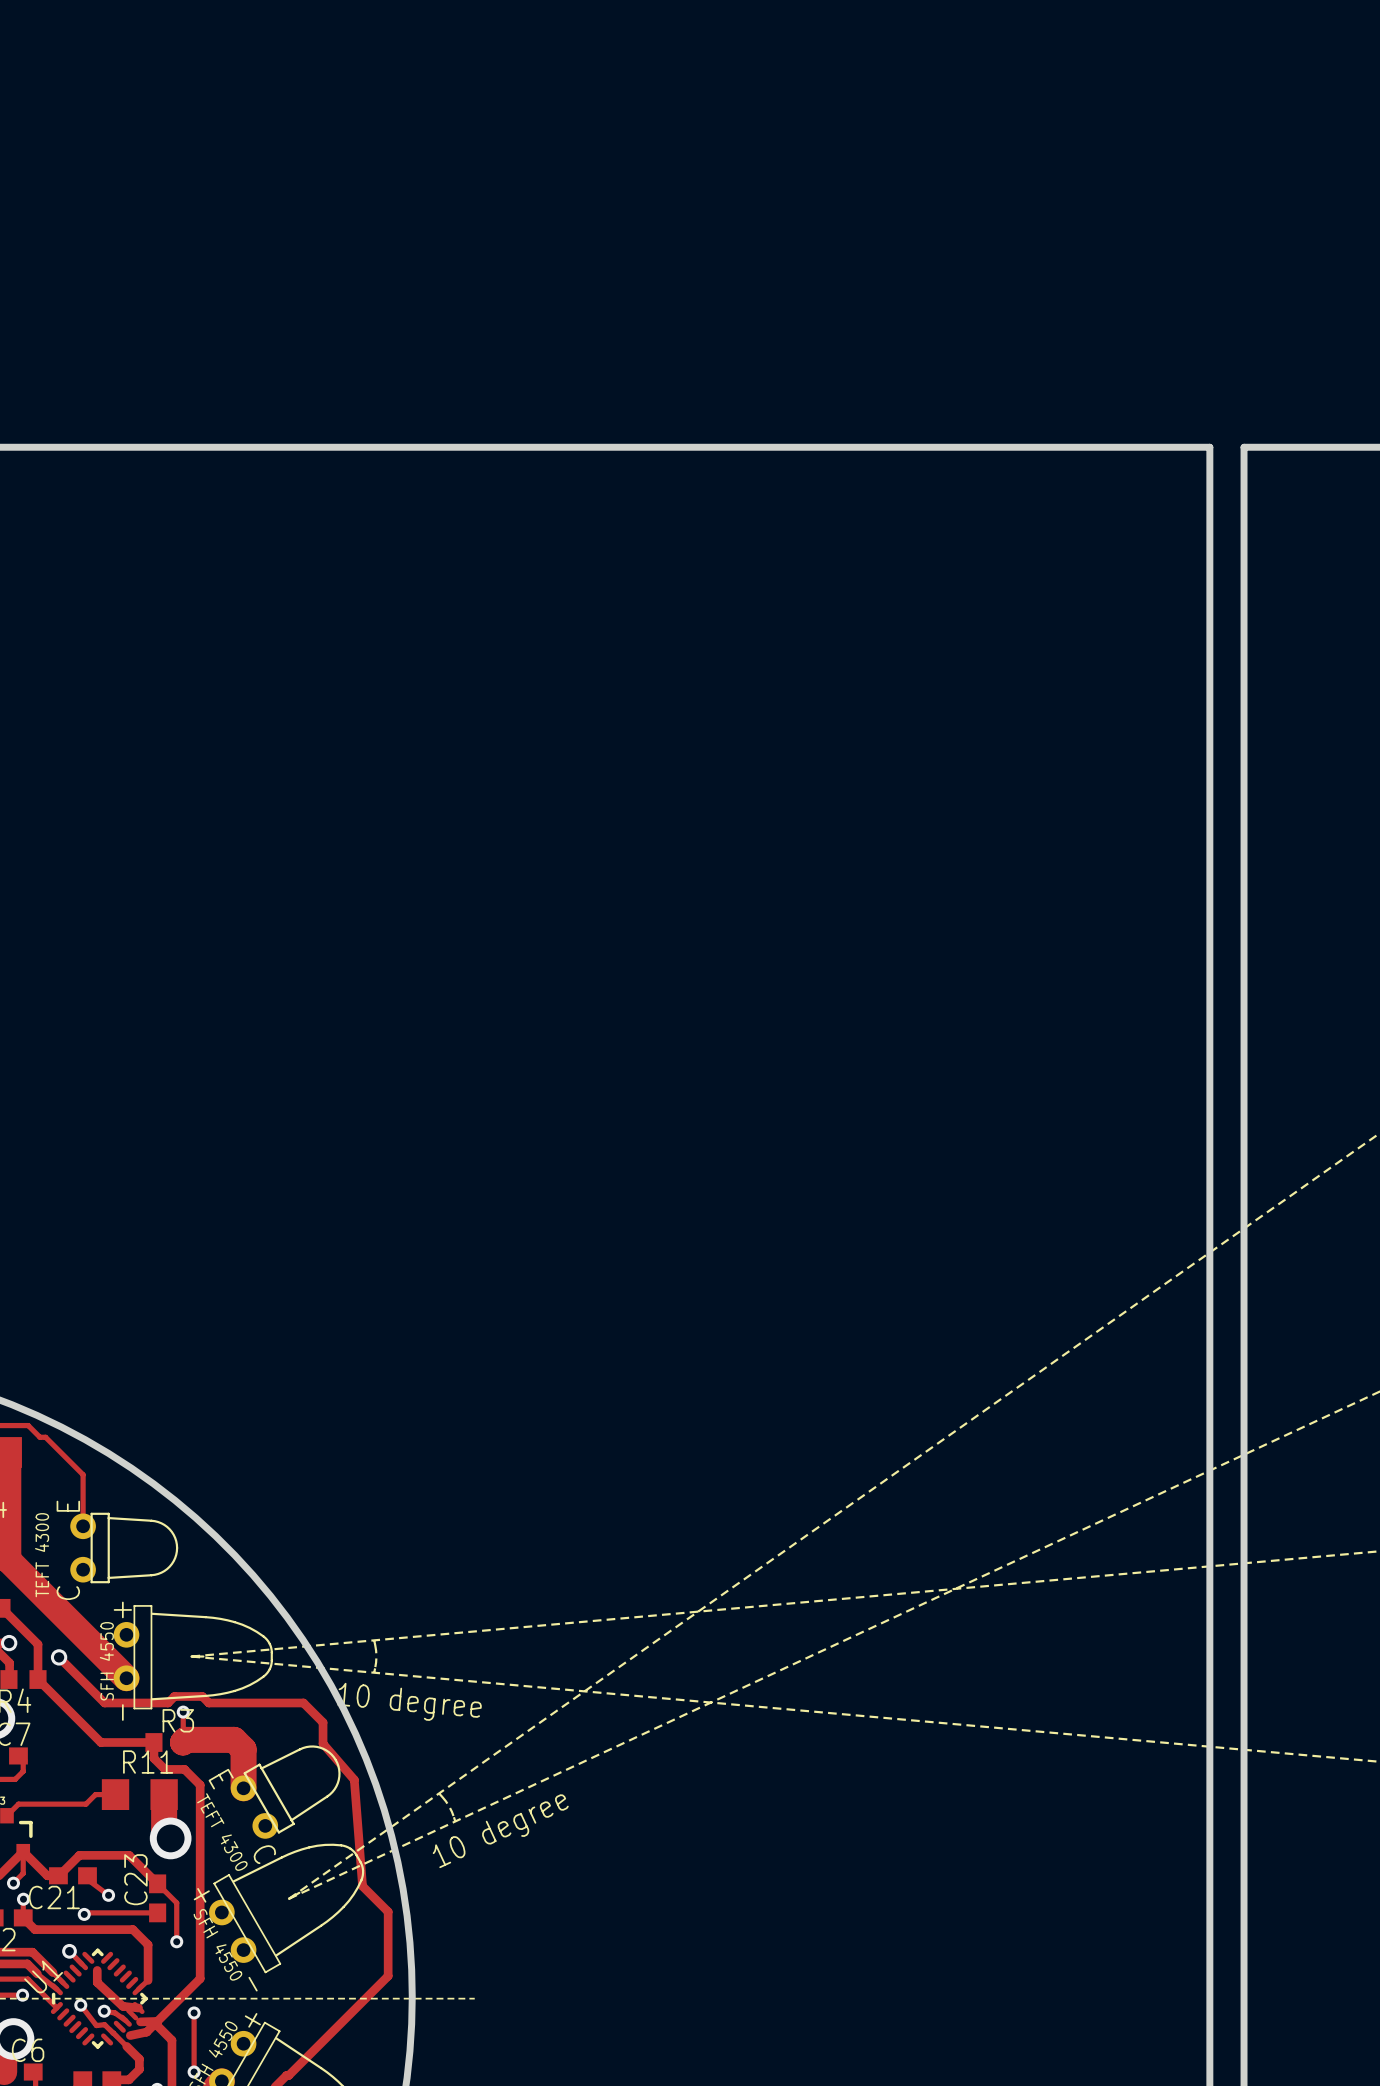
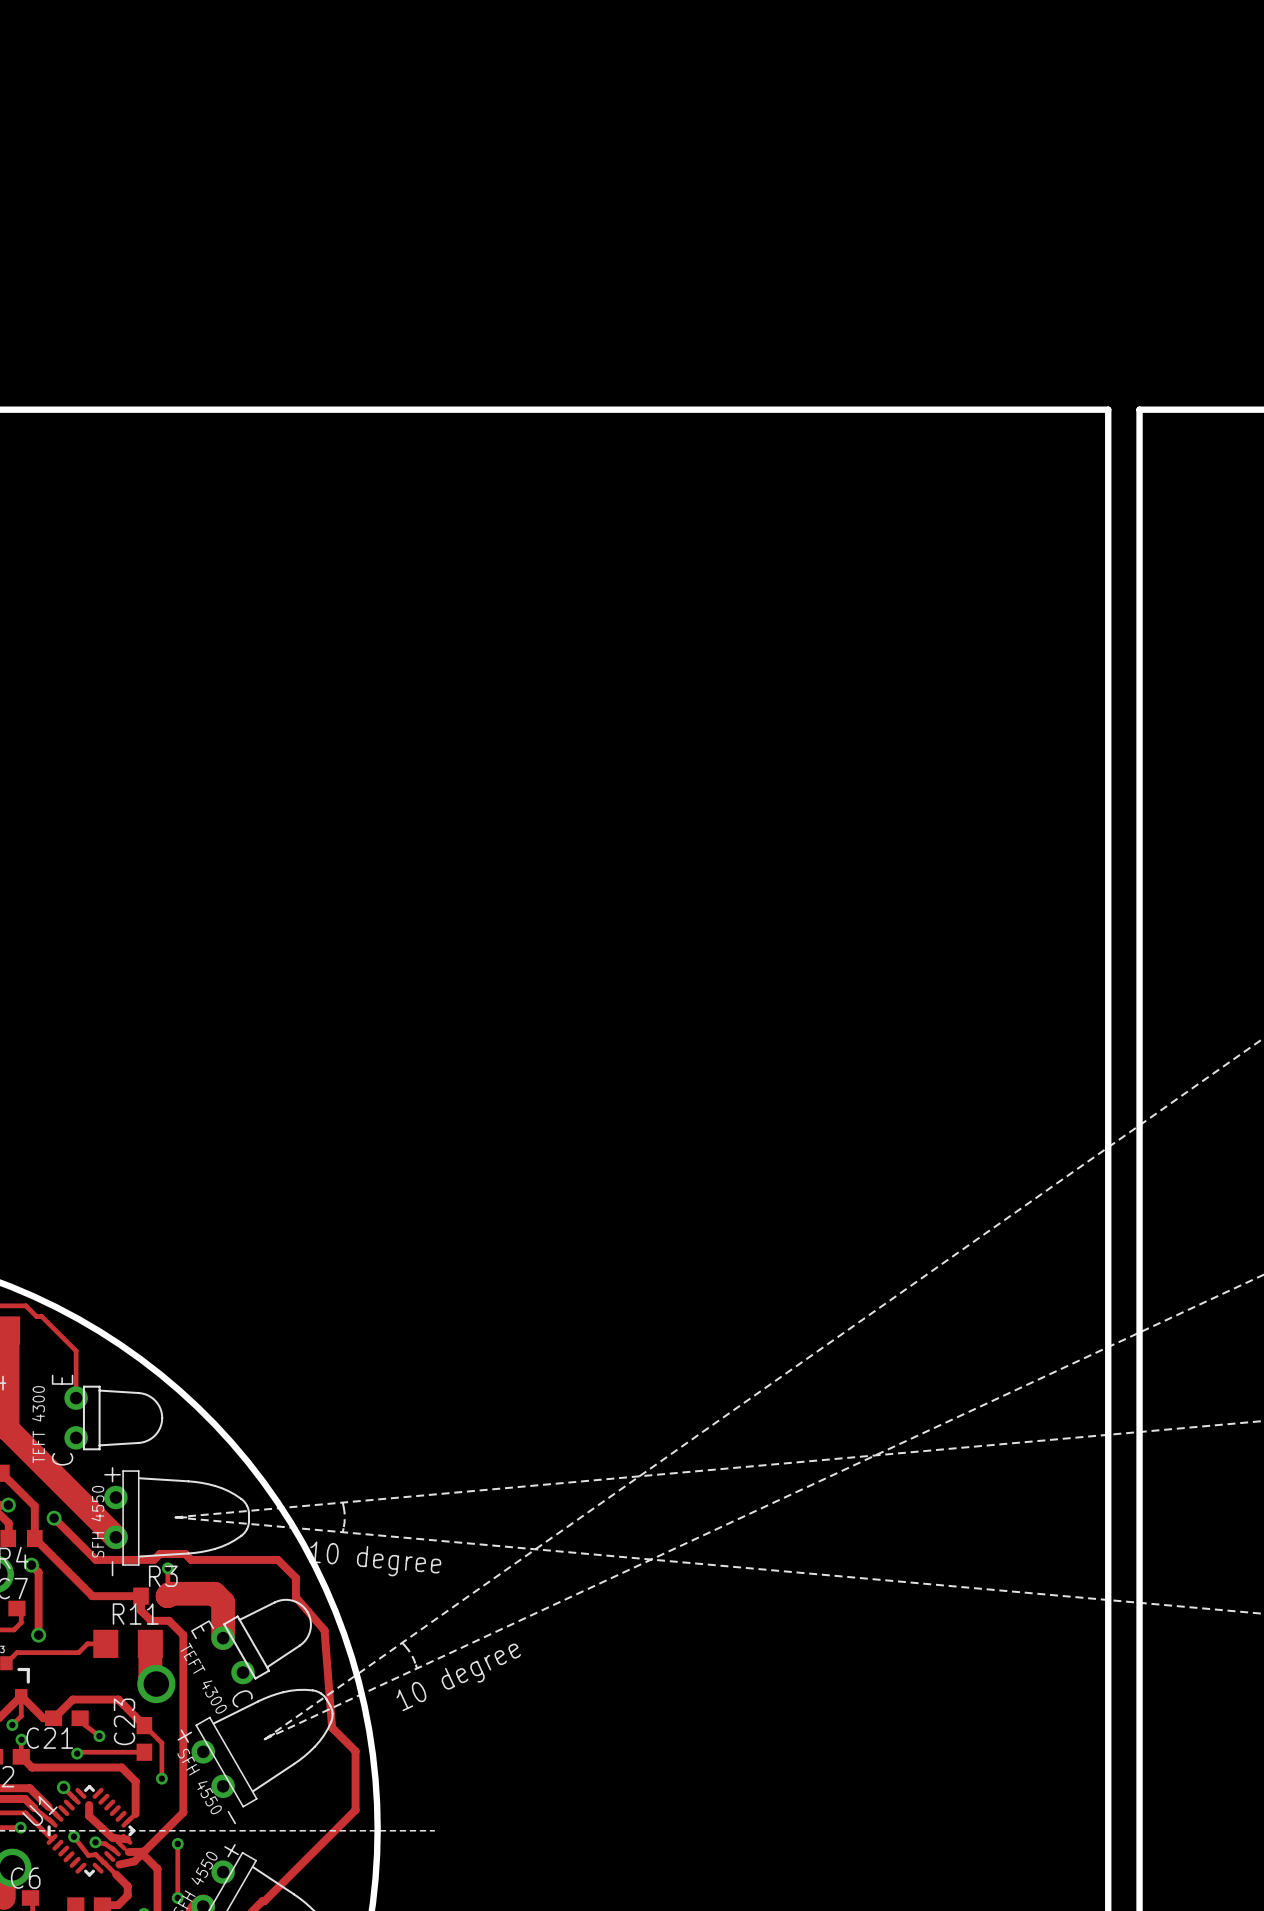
track: none -> (31, 1565) (38, 1572) (38, 1635)
via: none -> (31, 1565)
via: none -> (38, 1635)

